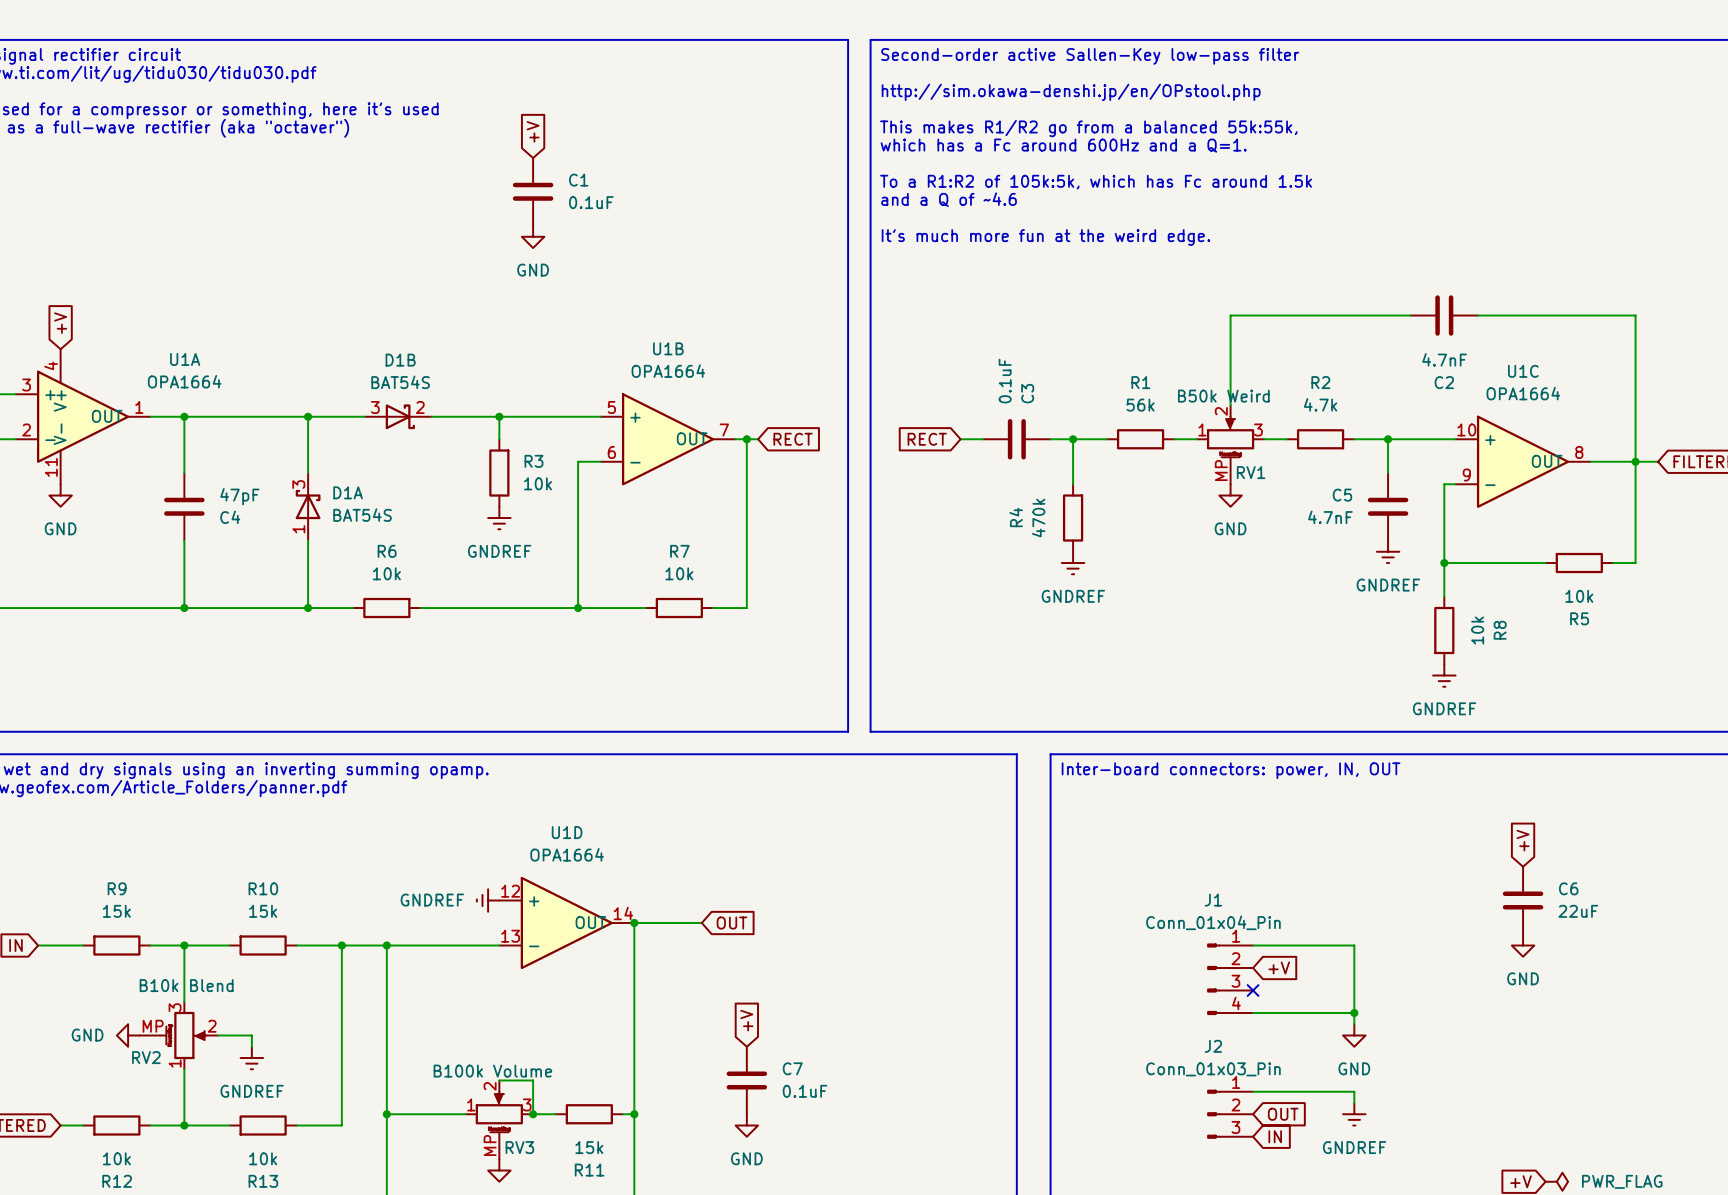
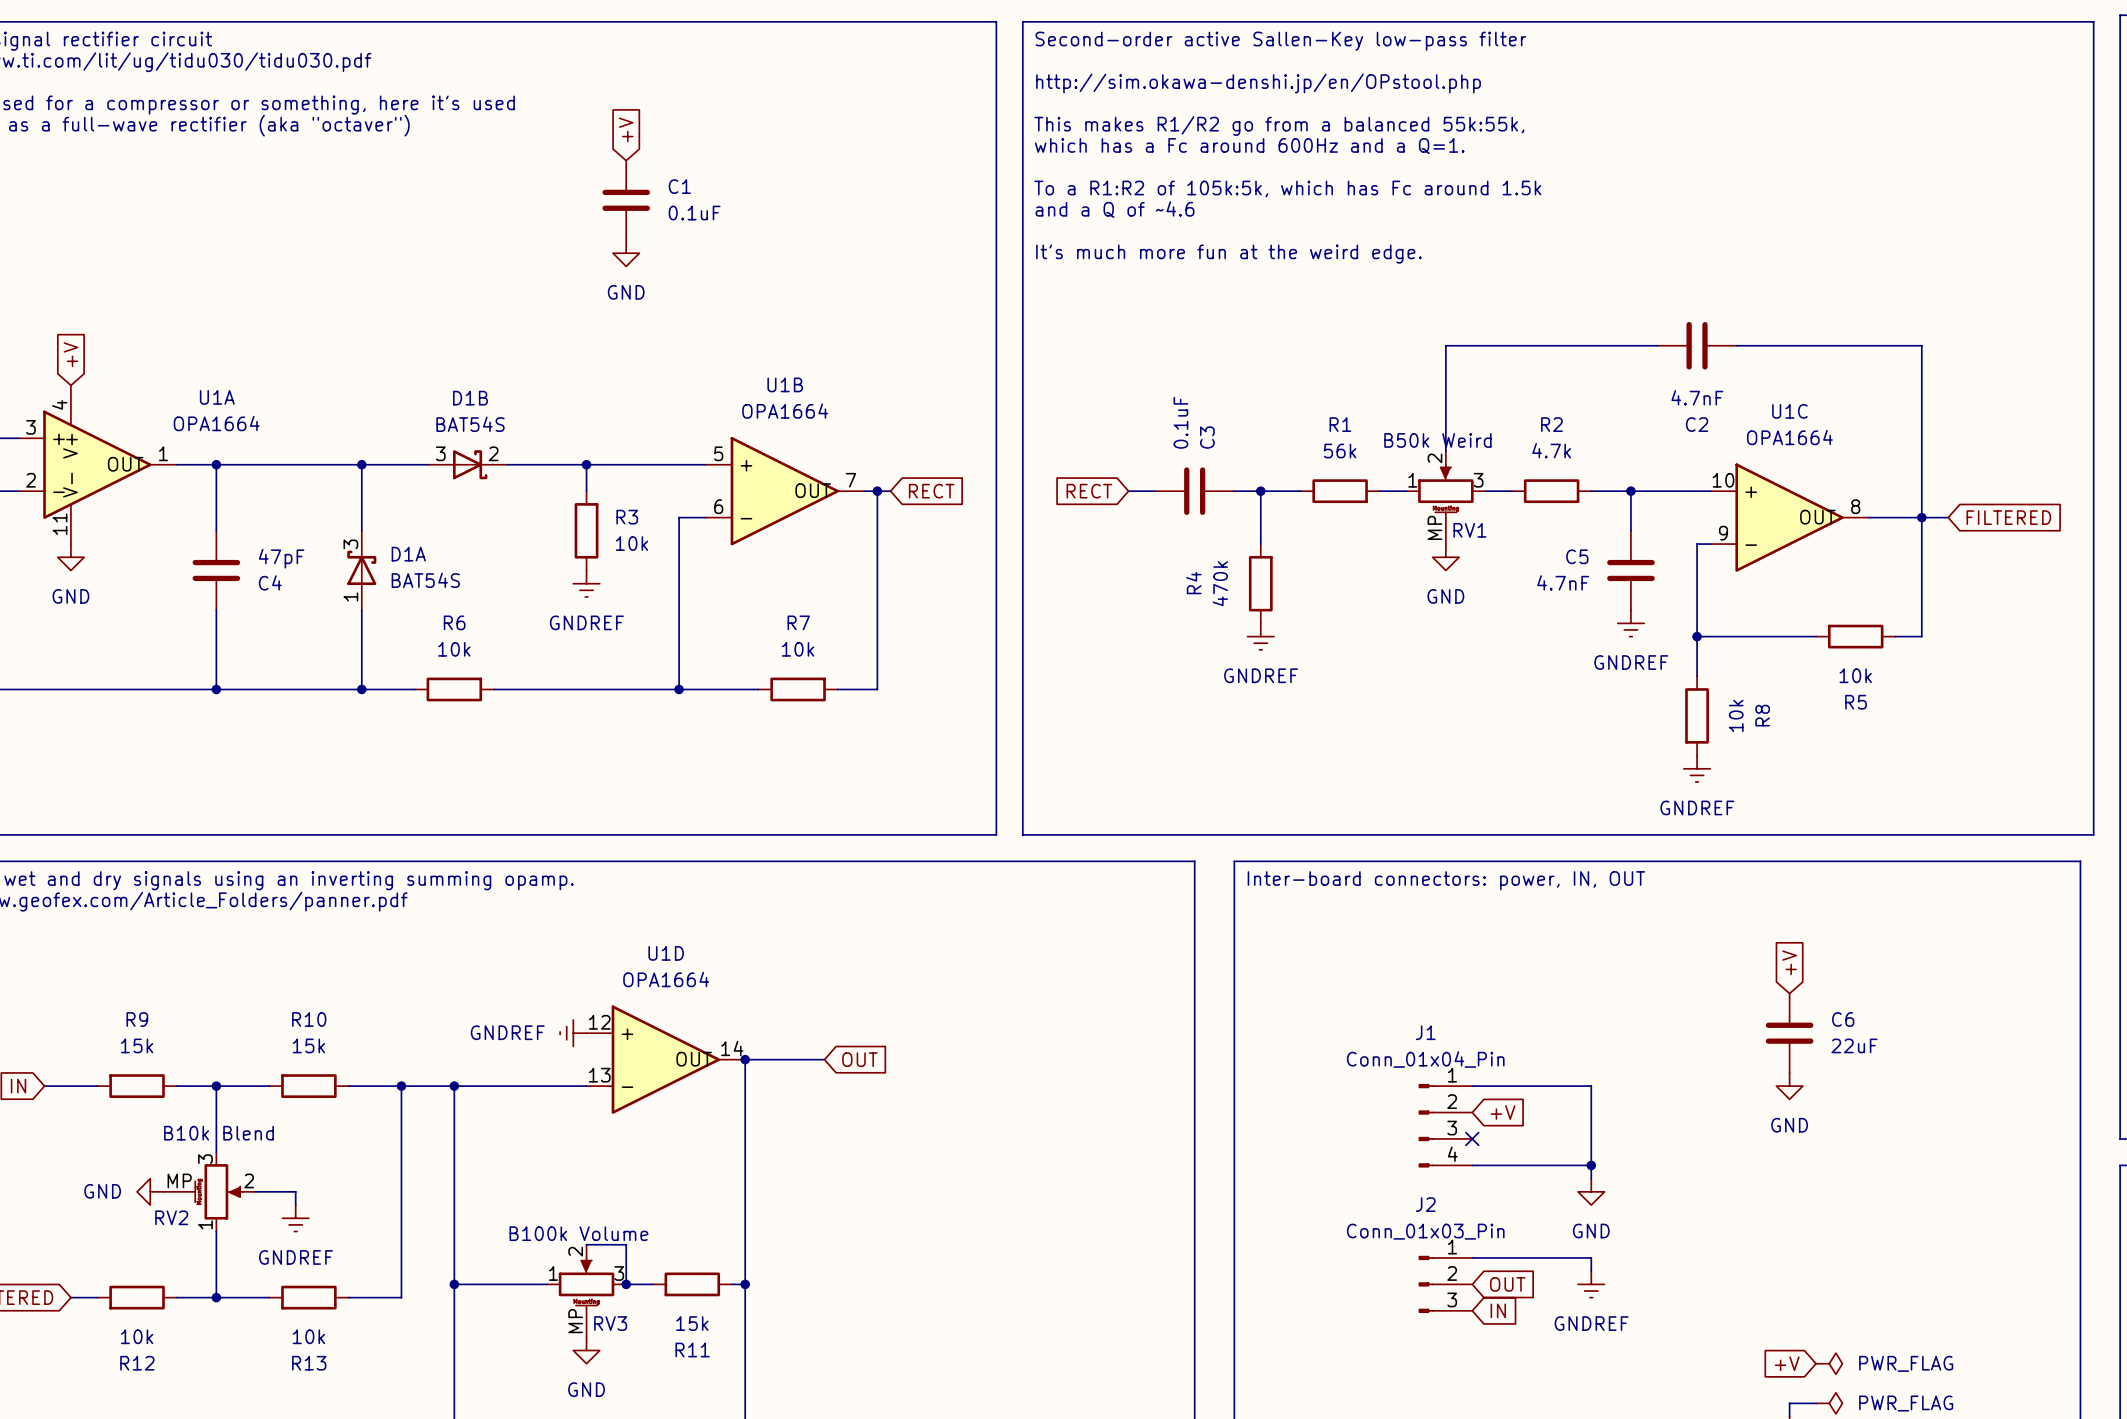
global label: +V (746, 1020) -> none
C7: 0.1uF (746, 1080) -> none
power symbol: GND (746, 1125) -> none

